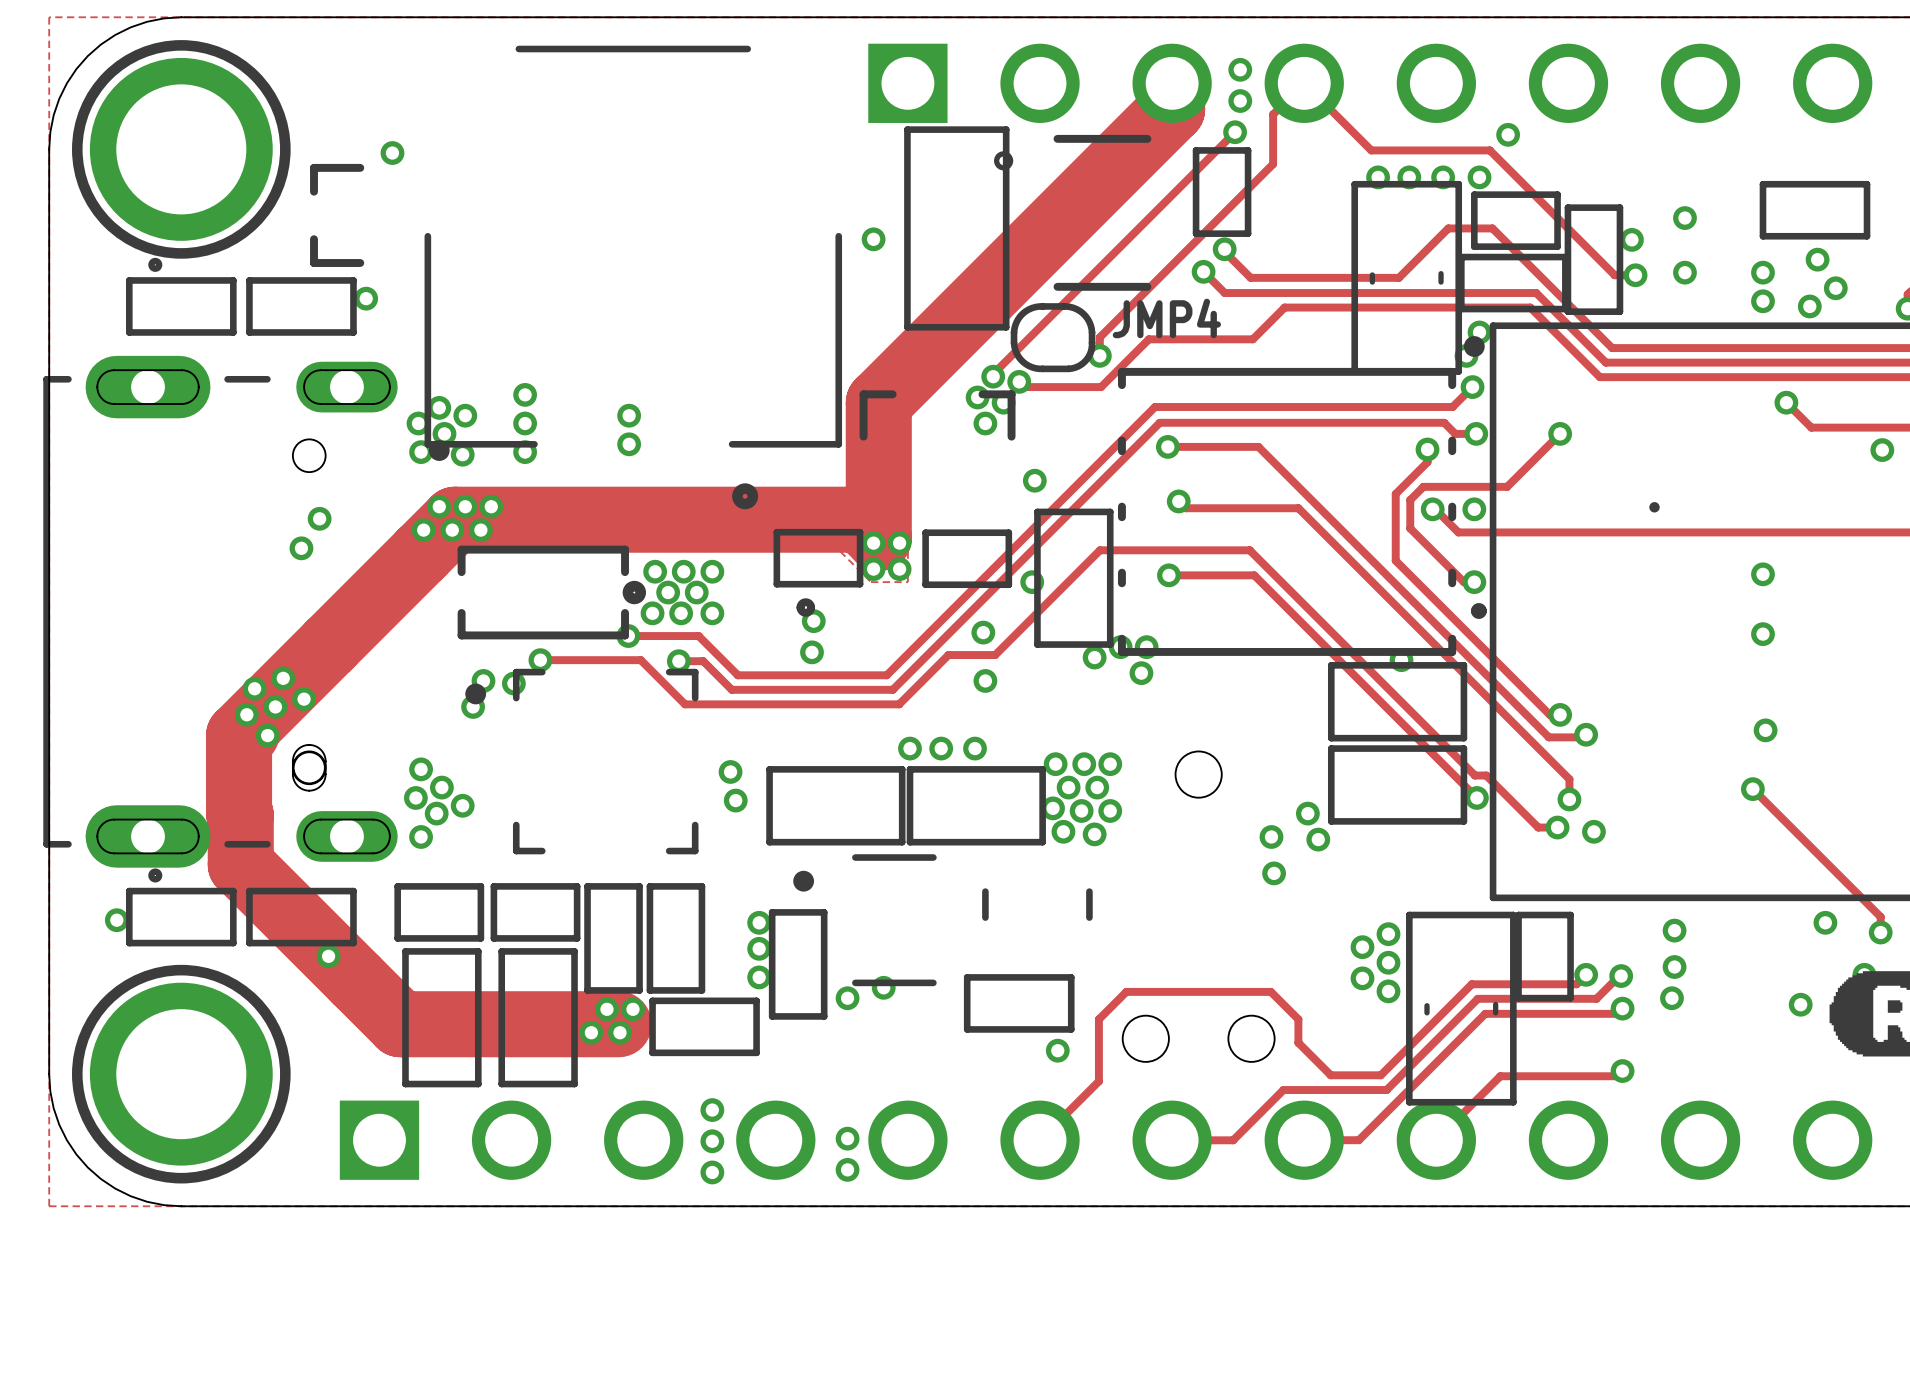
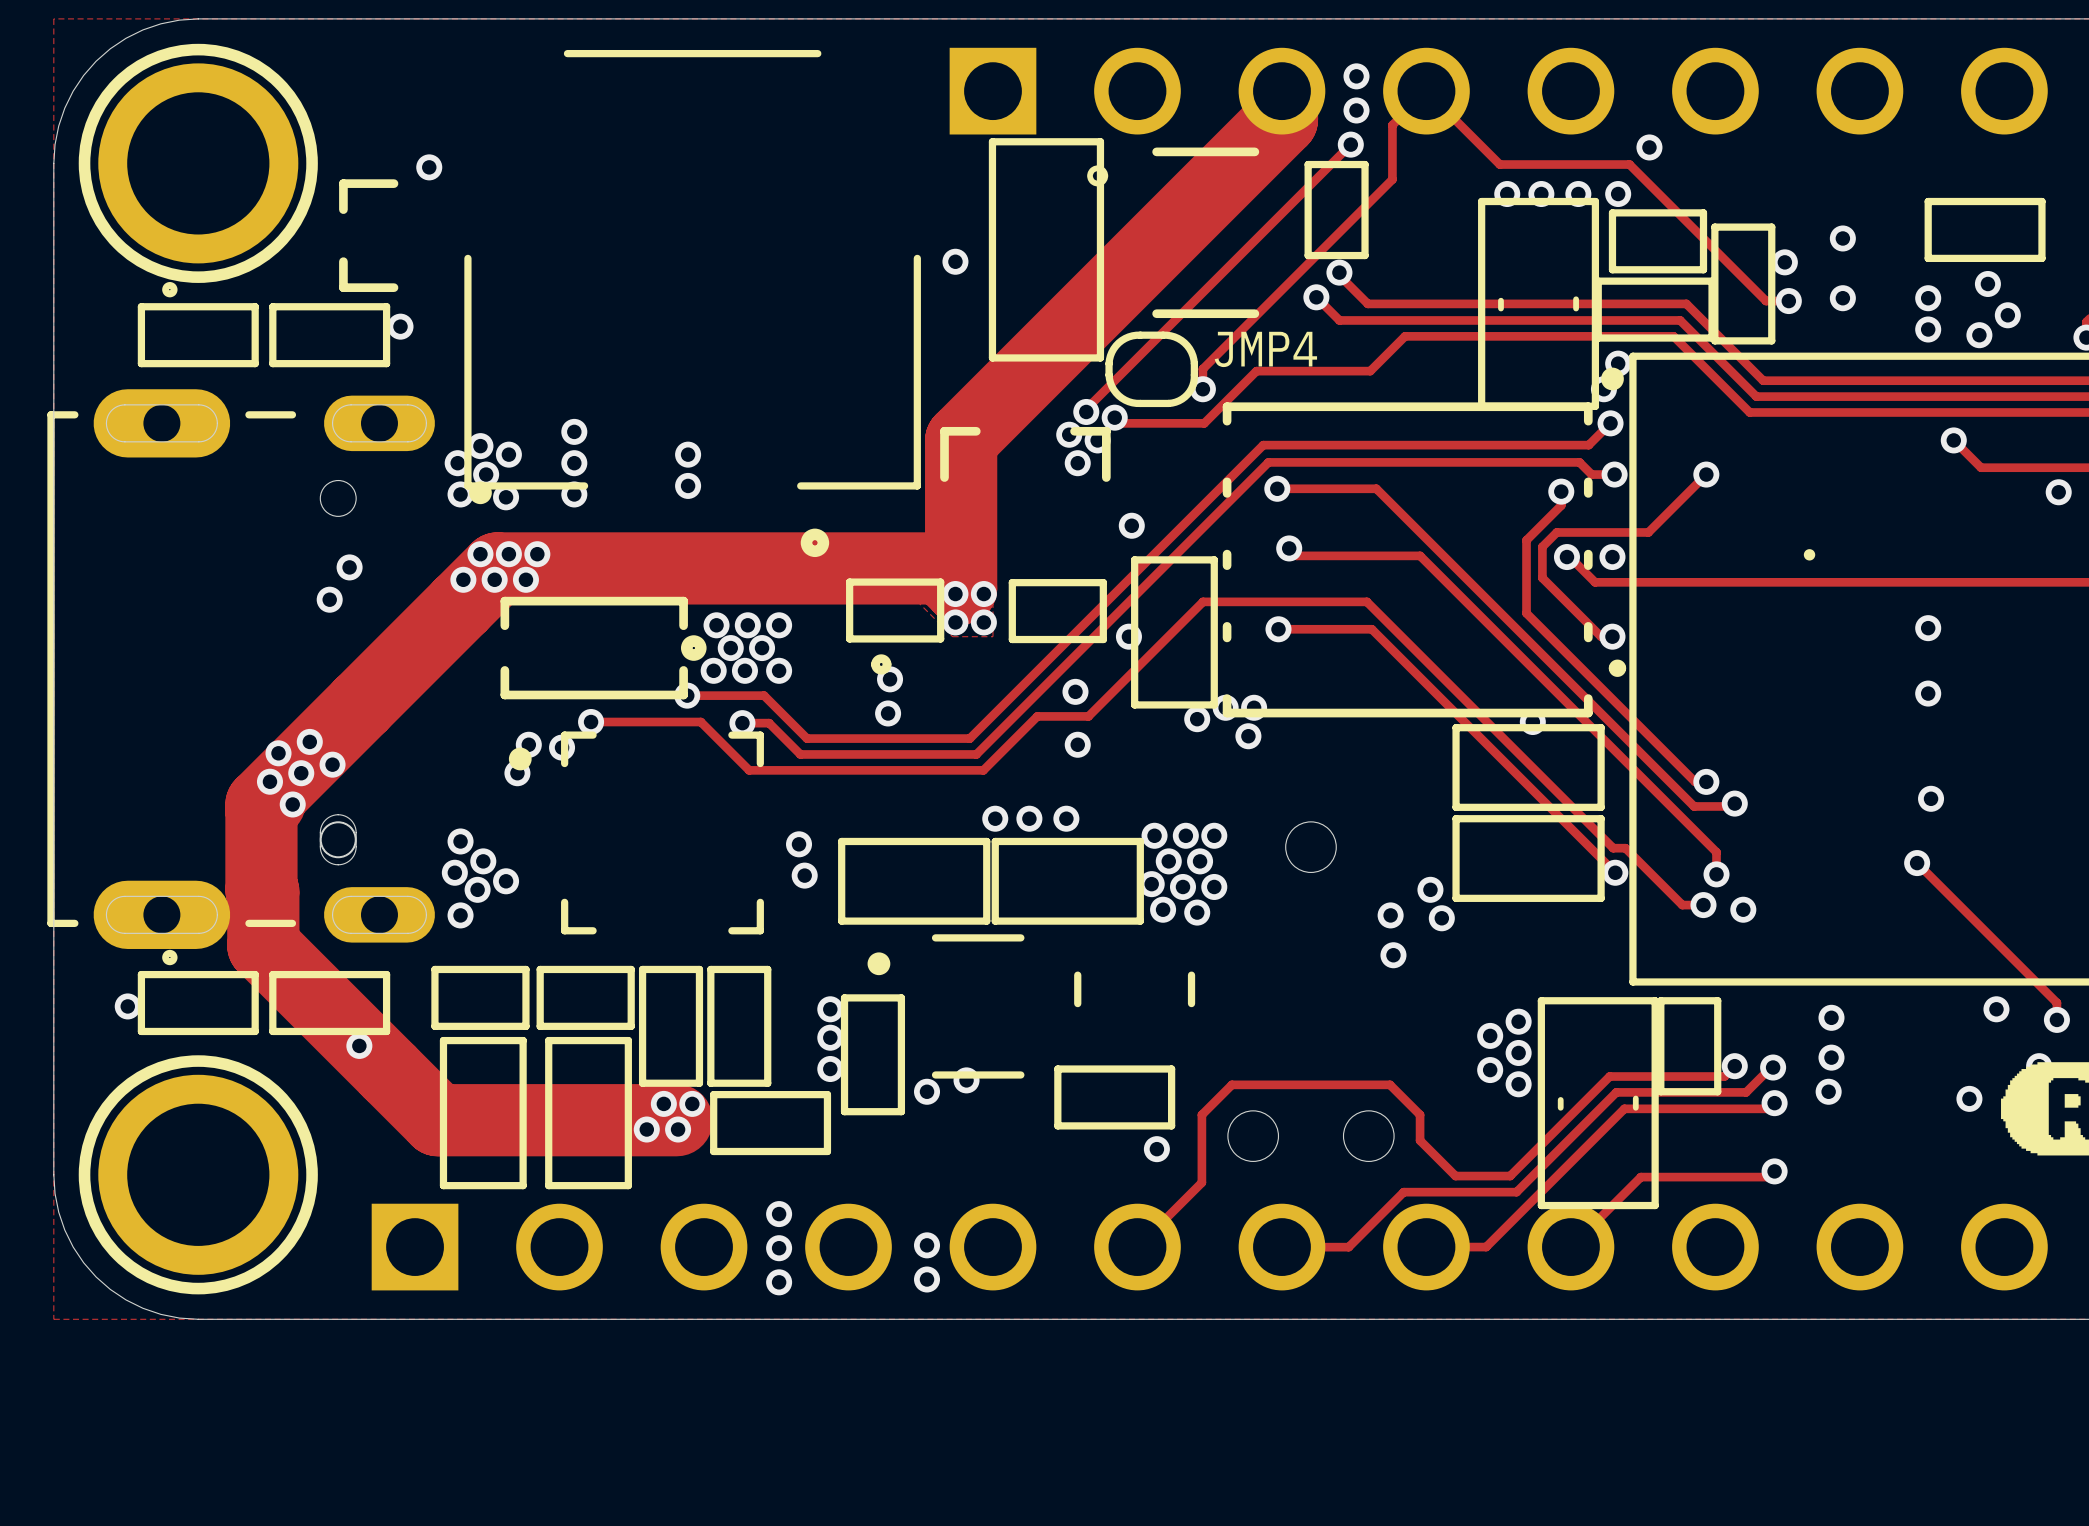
track: (1398, 277) (1448, 228) (1492, 228) (1541, 277) -> (1529, 303) (1686, 303)

